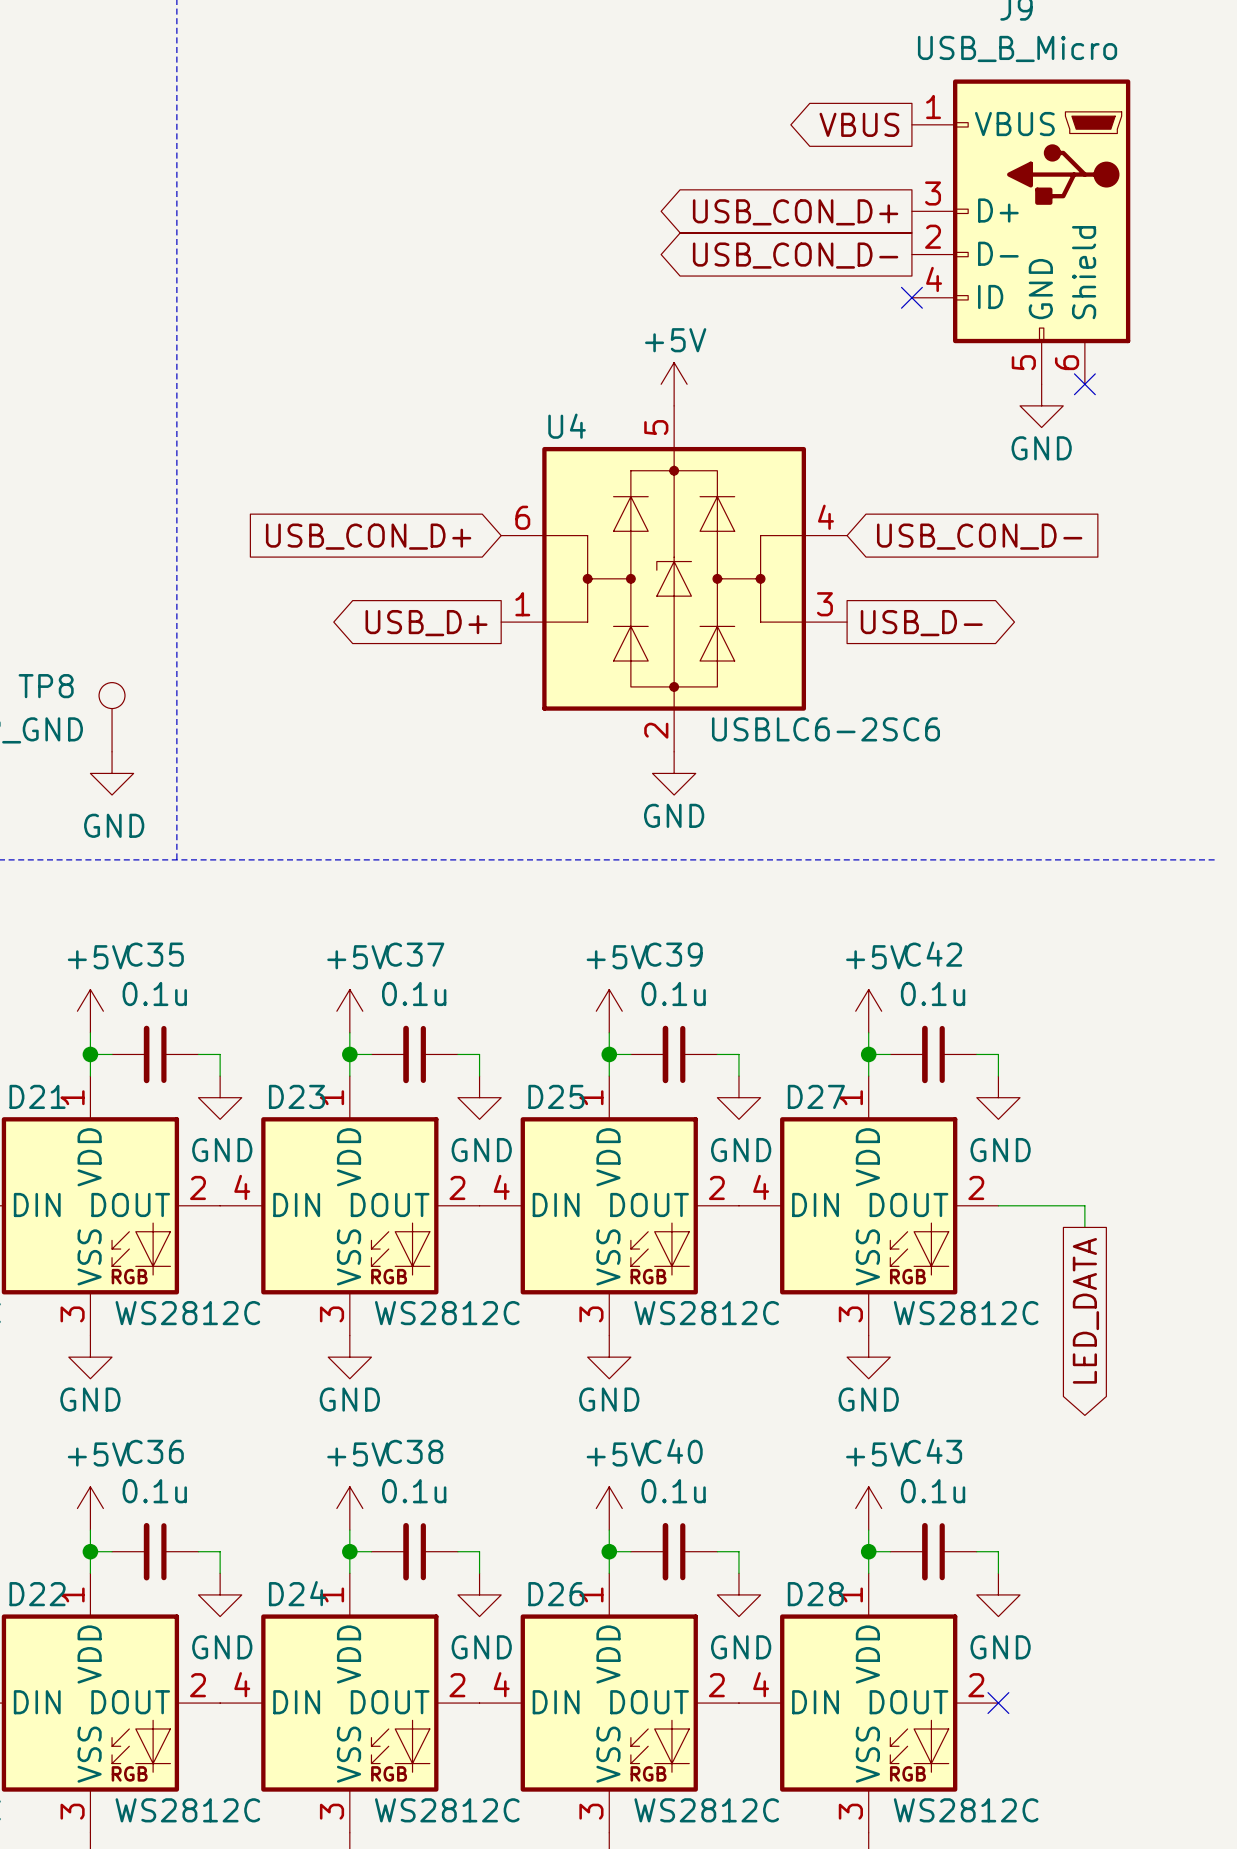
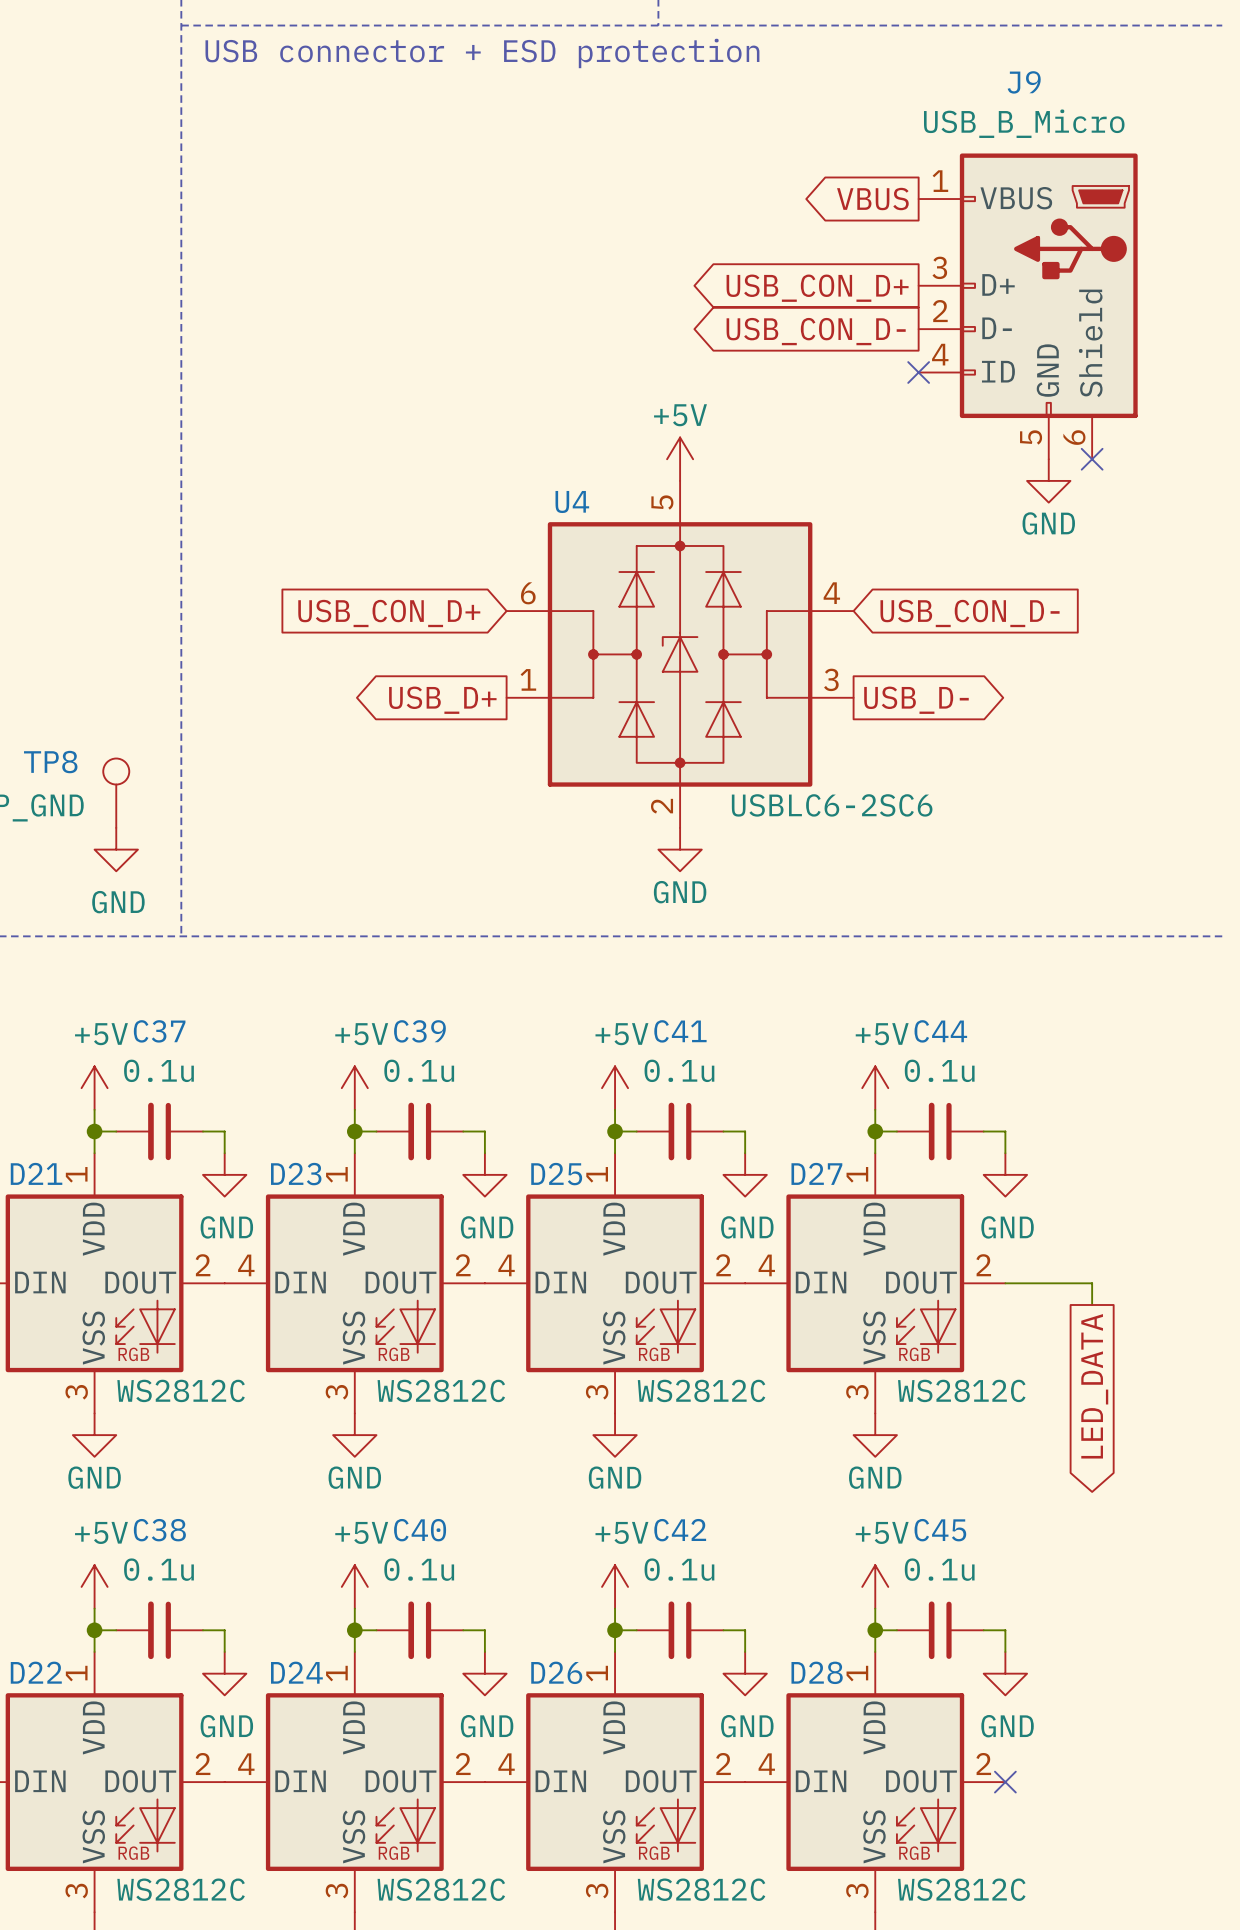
C35 name: C35 (155, 954) -> C37 (159, 1031)
C37 name: C37 (415, 954) -> C39 (419, 1031)
C39 name: C39 (674, 954) -> C41 (680, 1031)
C42 name: C42 (933, 954) -> C44 (940, 1031)
C36 name: C36 (155, 1451) -> C38 (159, 1530)
C38 name: C38 (414, 1451) -> C40 (420, 1530)
C40 name: C40 (674, 1451) -> C42 (680, 1530)
C43 name: C43 (933, 1451) -> C45 (940, 1530)

